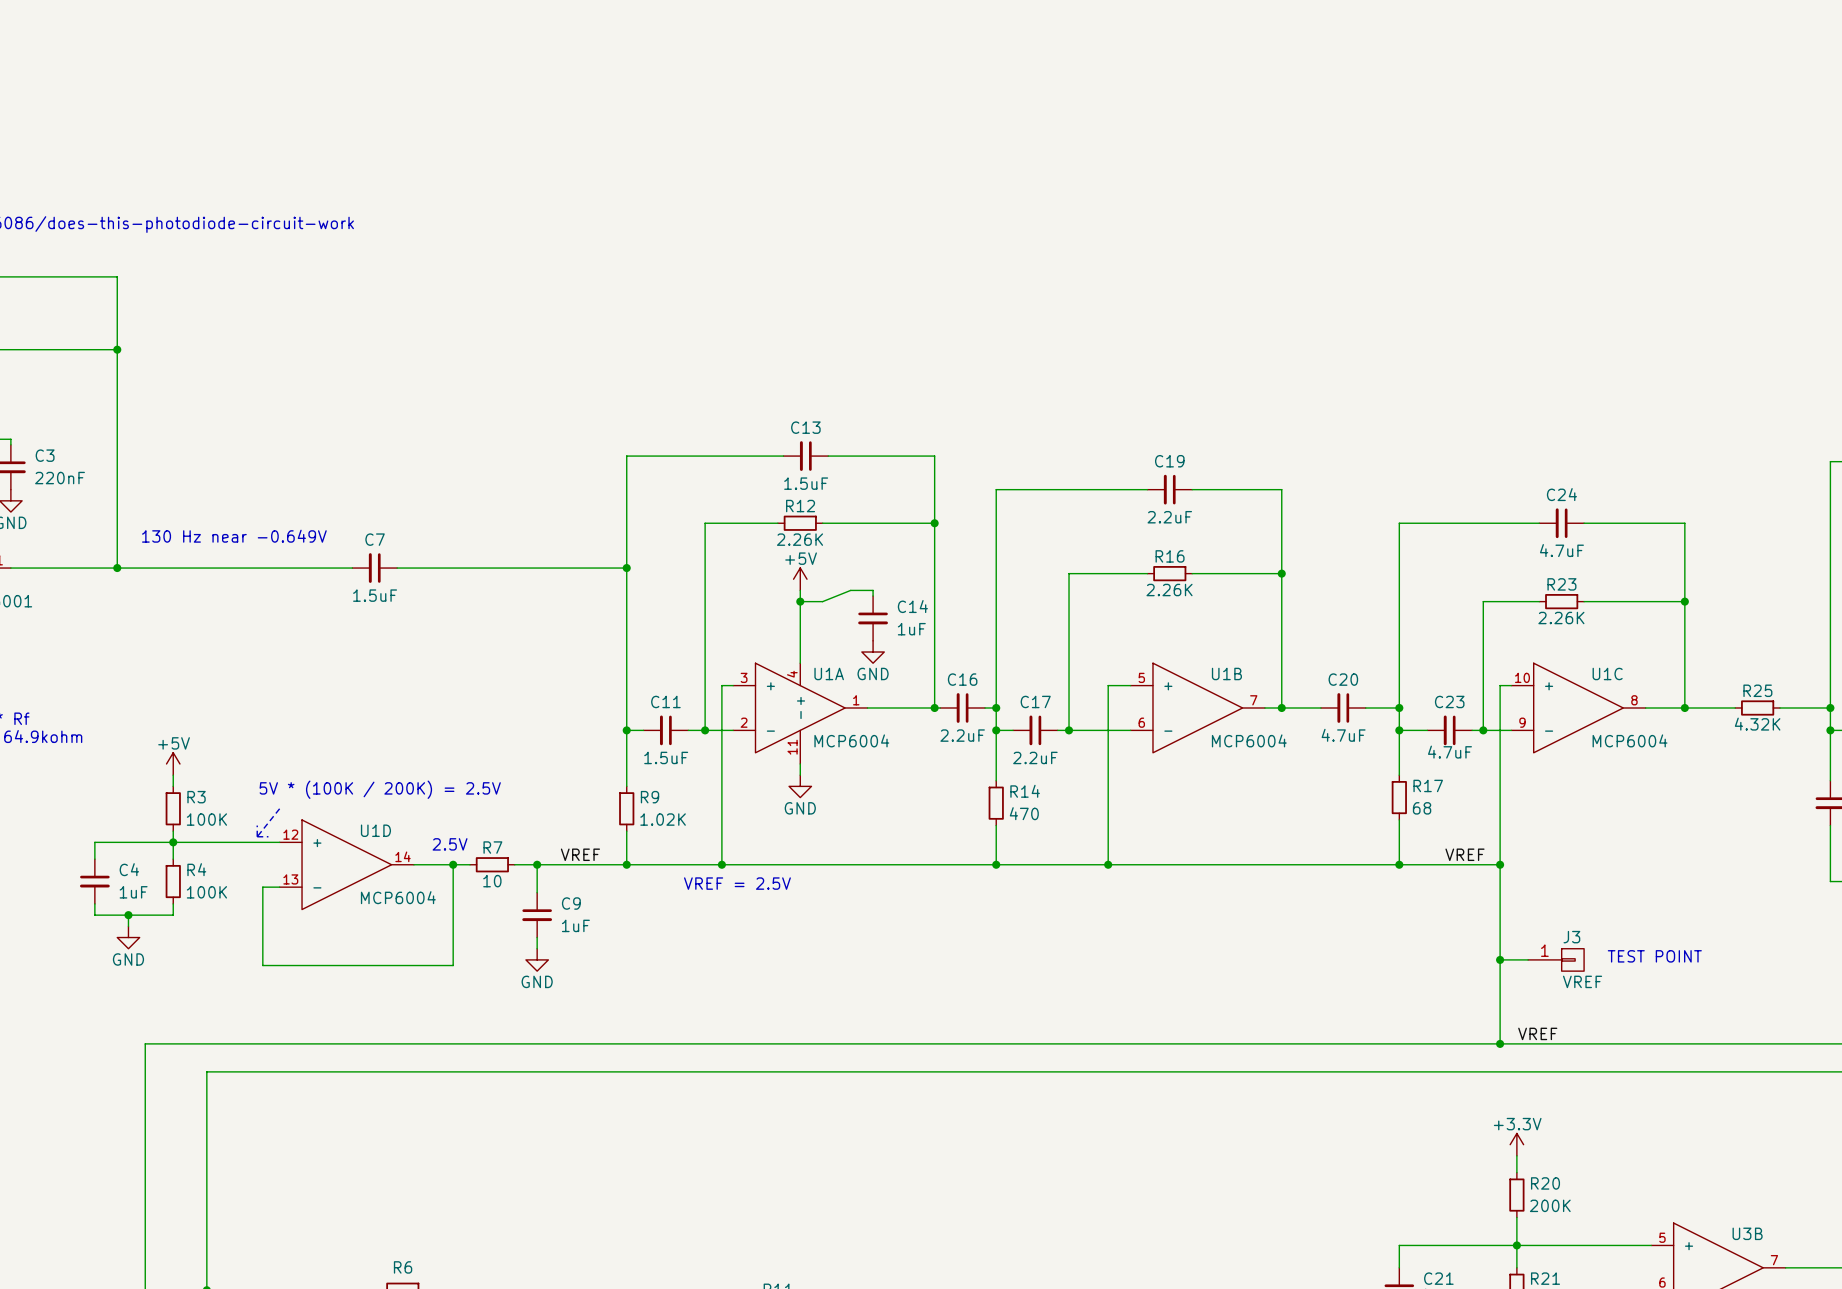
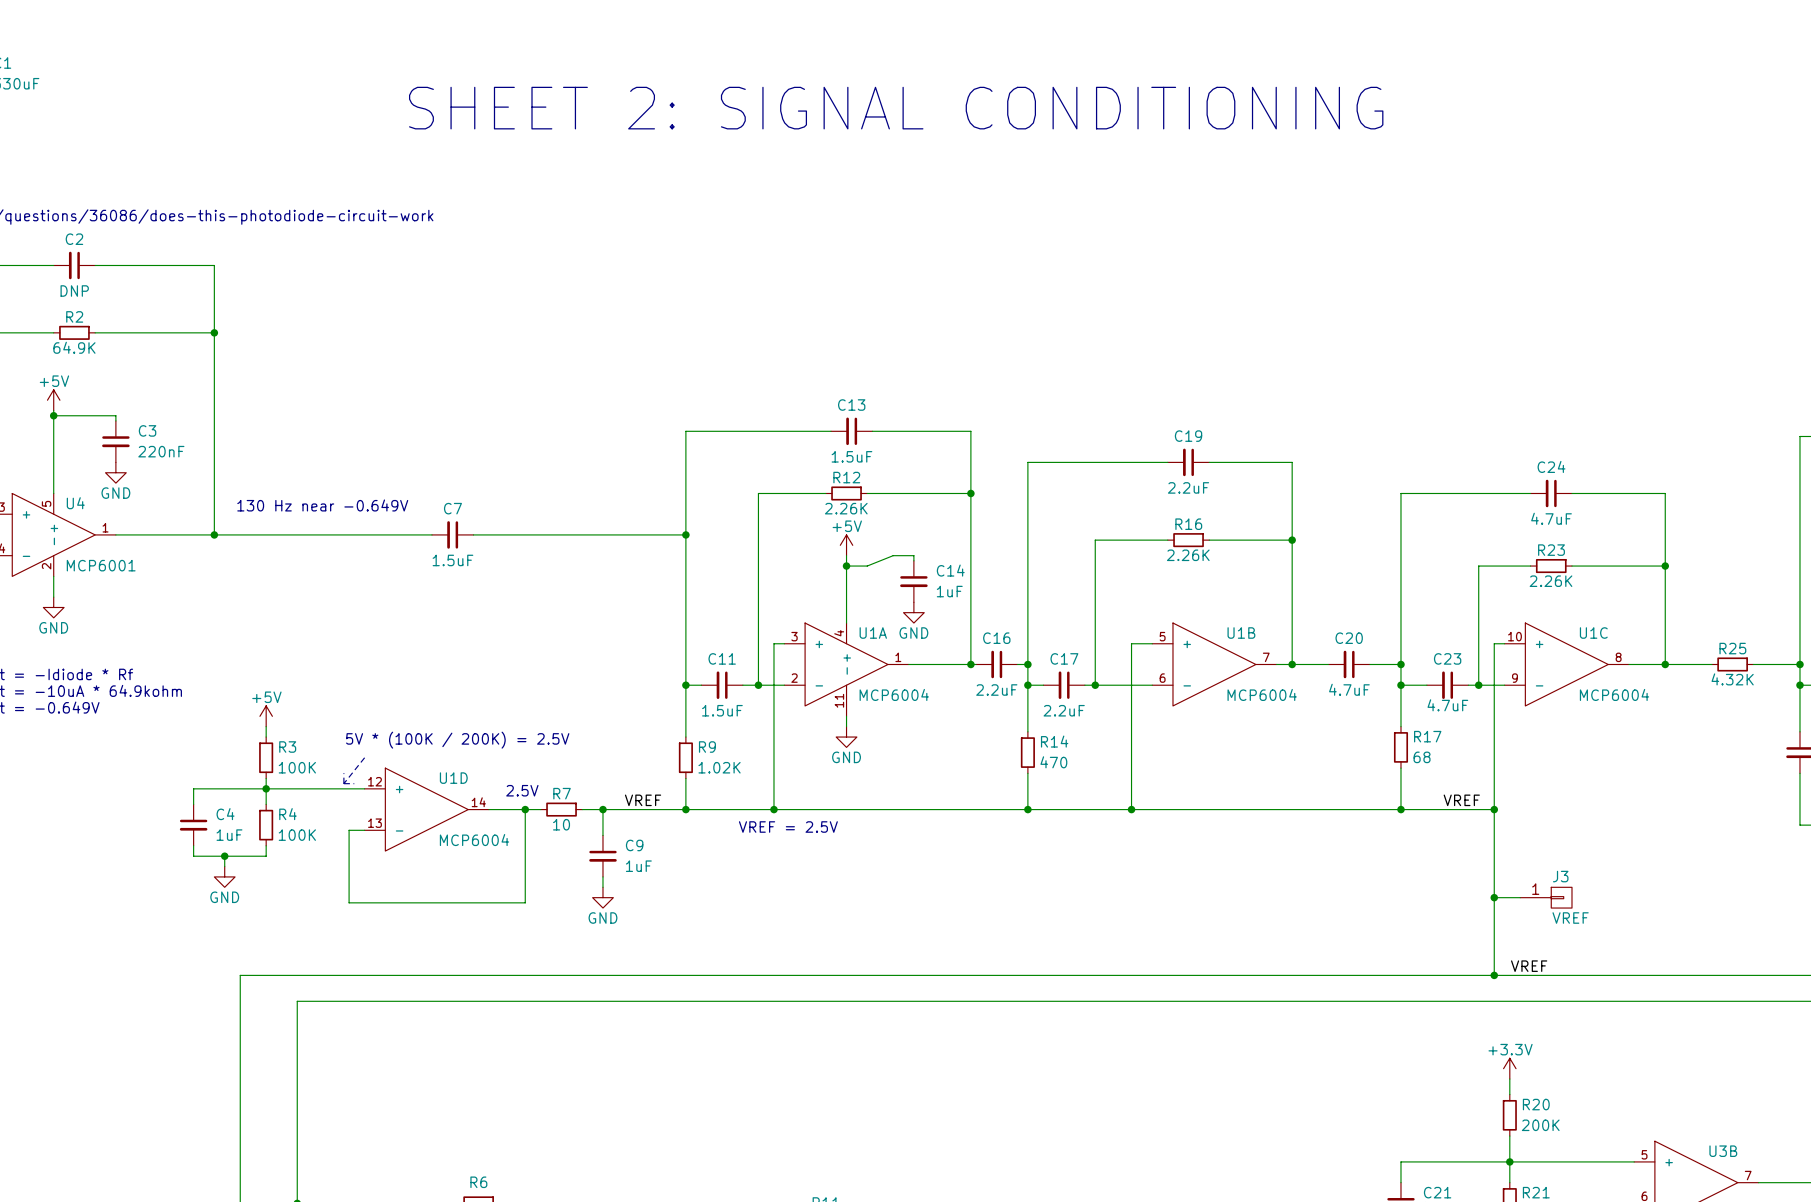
text: none -> SHEET 2: SIGNAL CONDITIONING (896, 108)
text: TEST POINT (1654, 956) -> none

